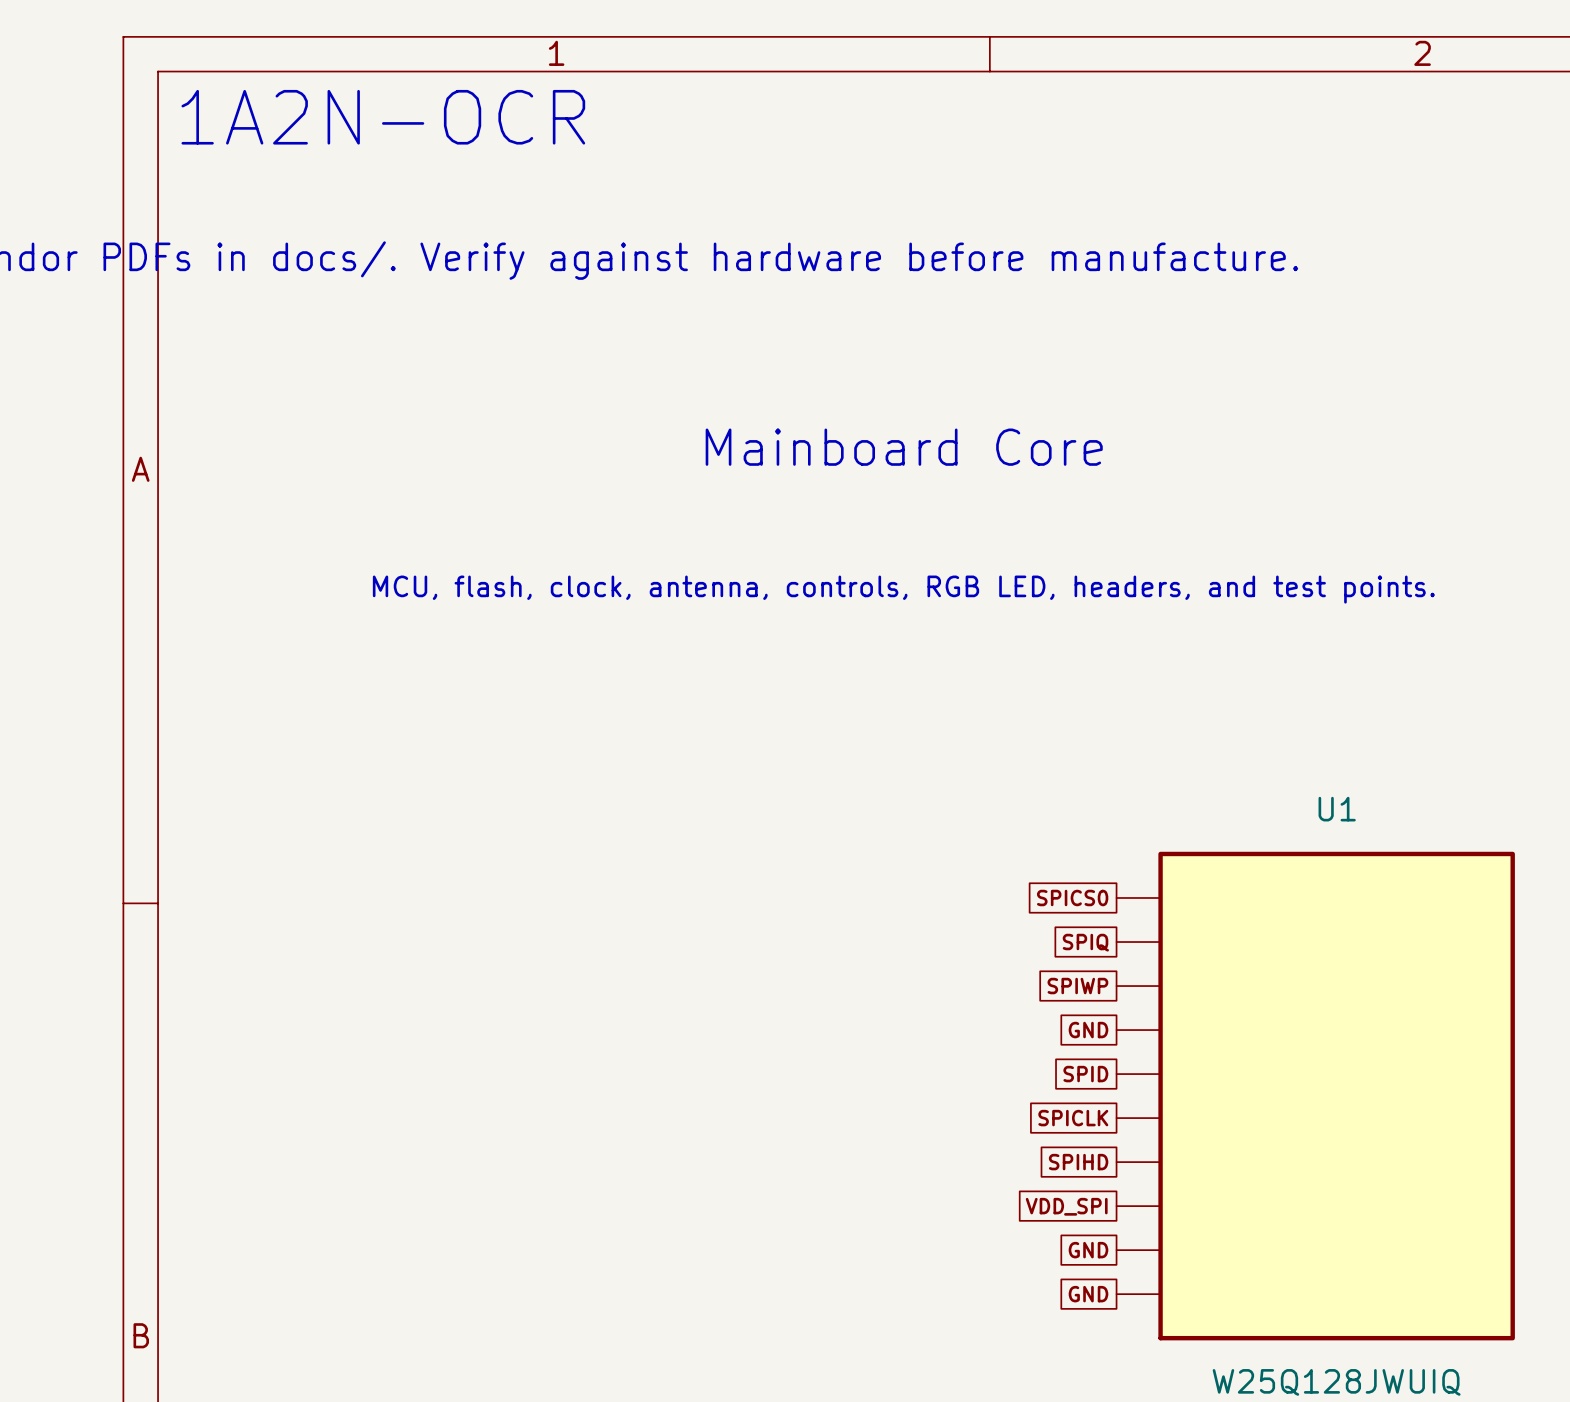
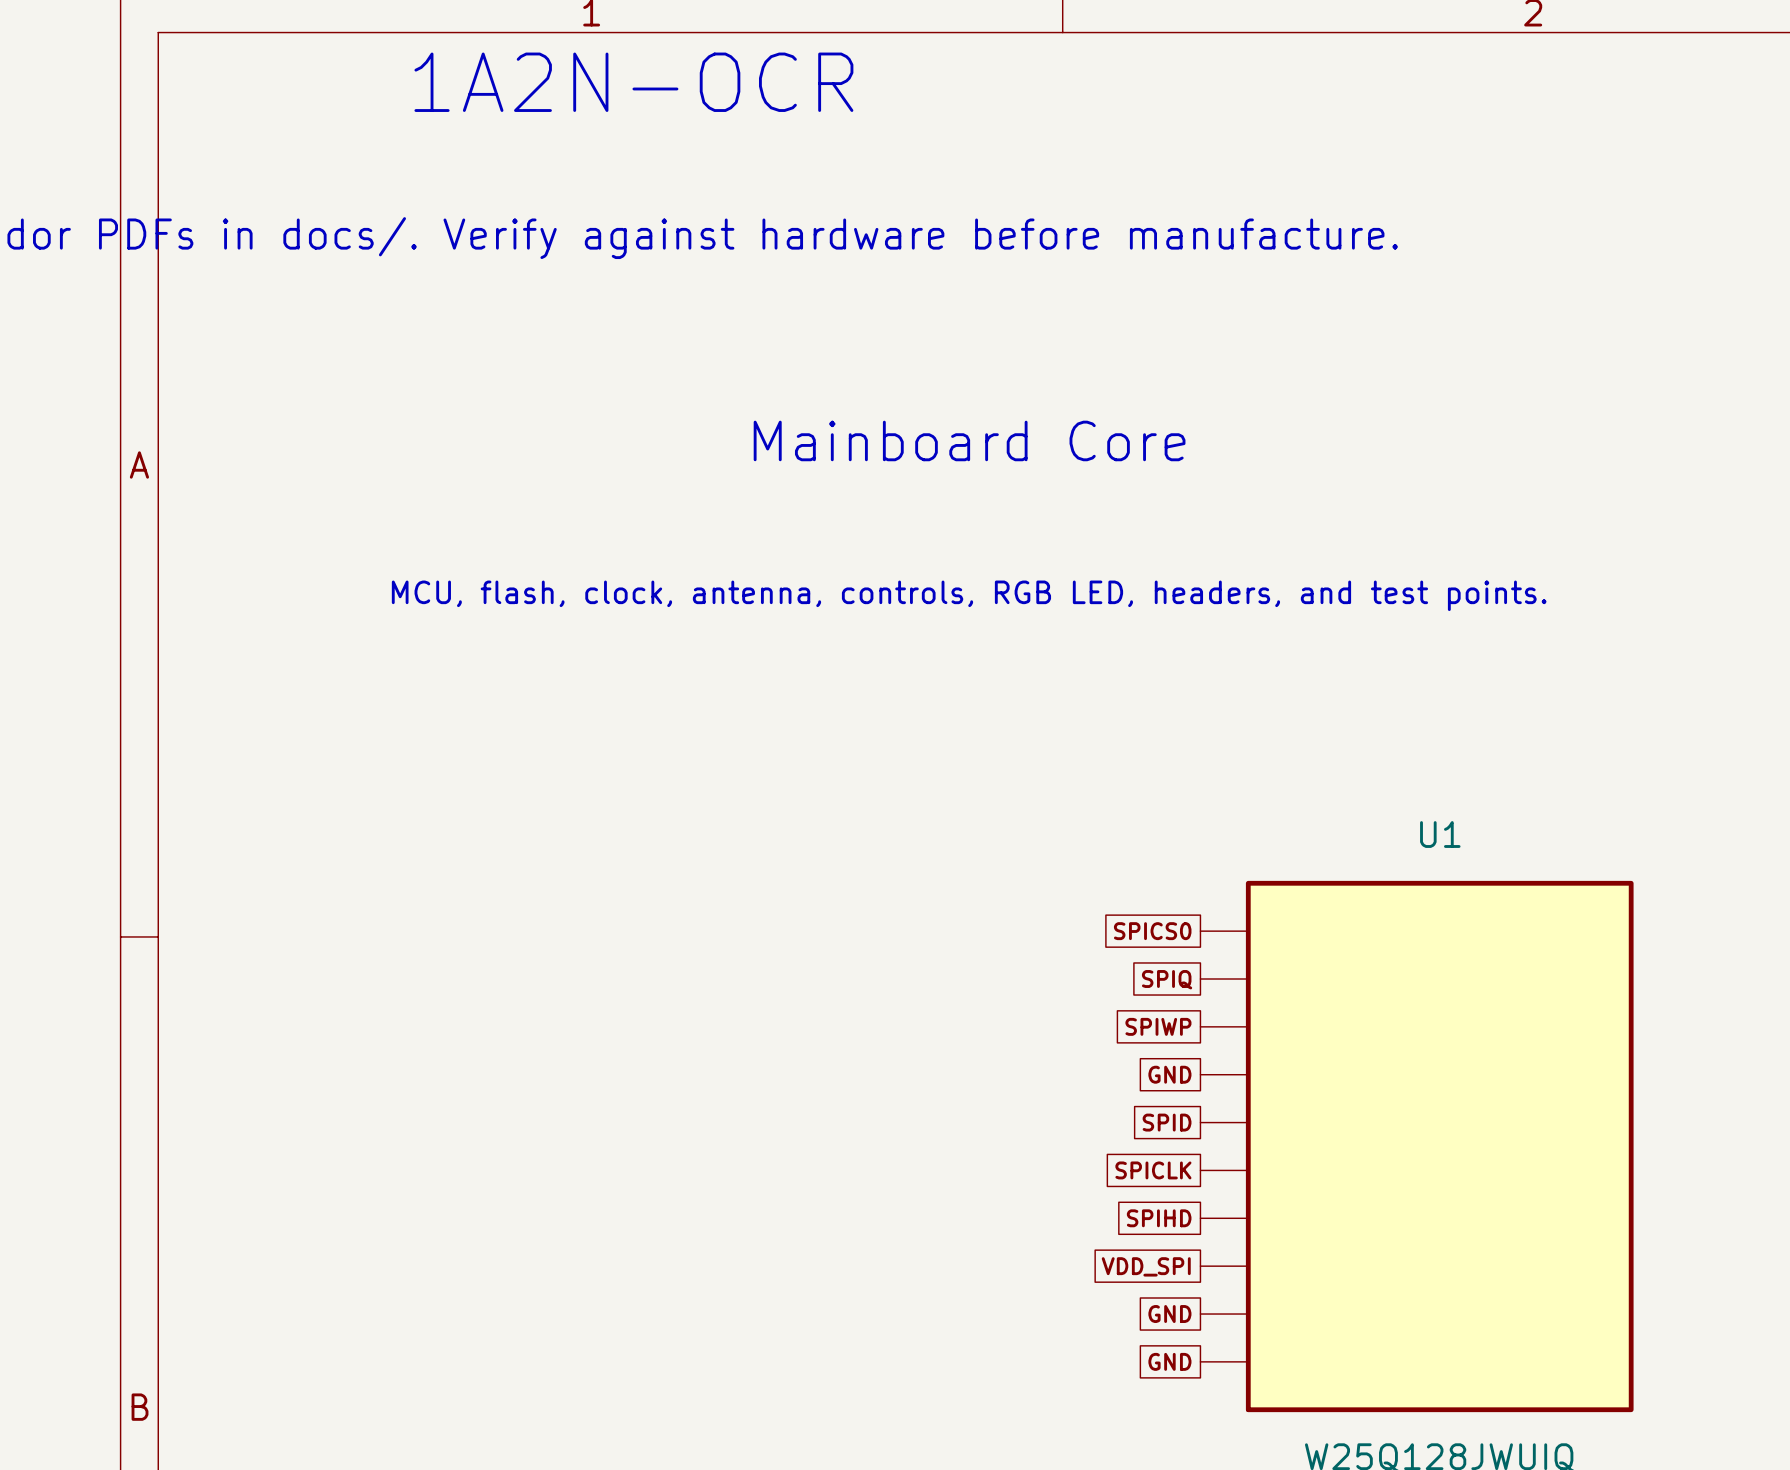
text position: 1A2N-OCR (383, 117) -> 1A2N-OCR (633, 82)

